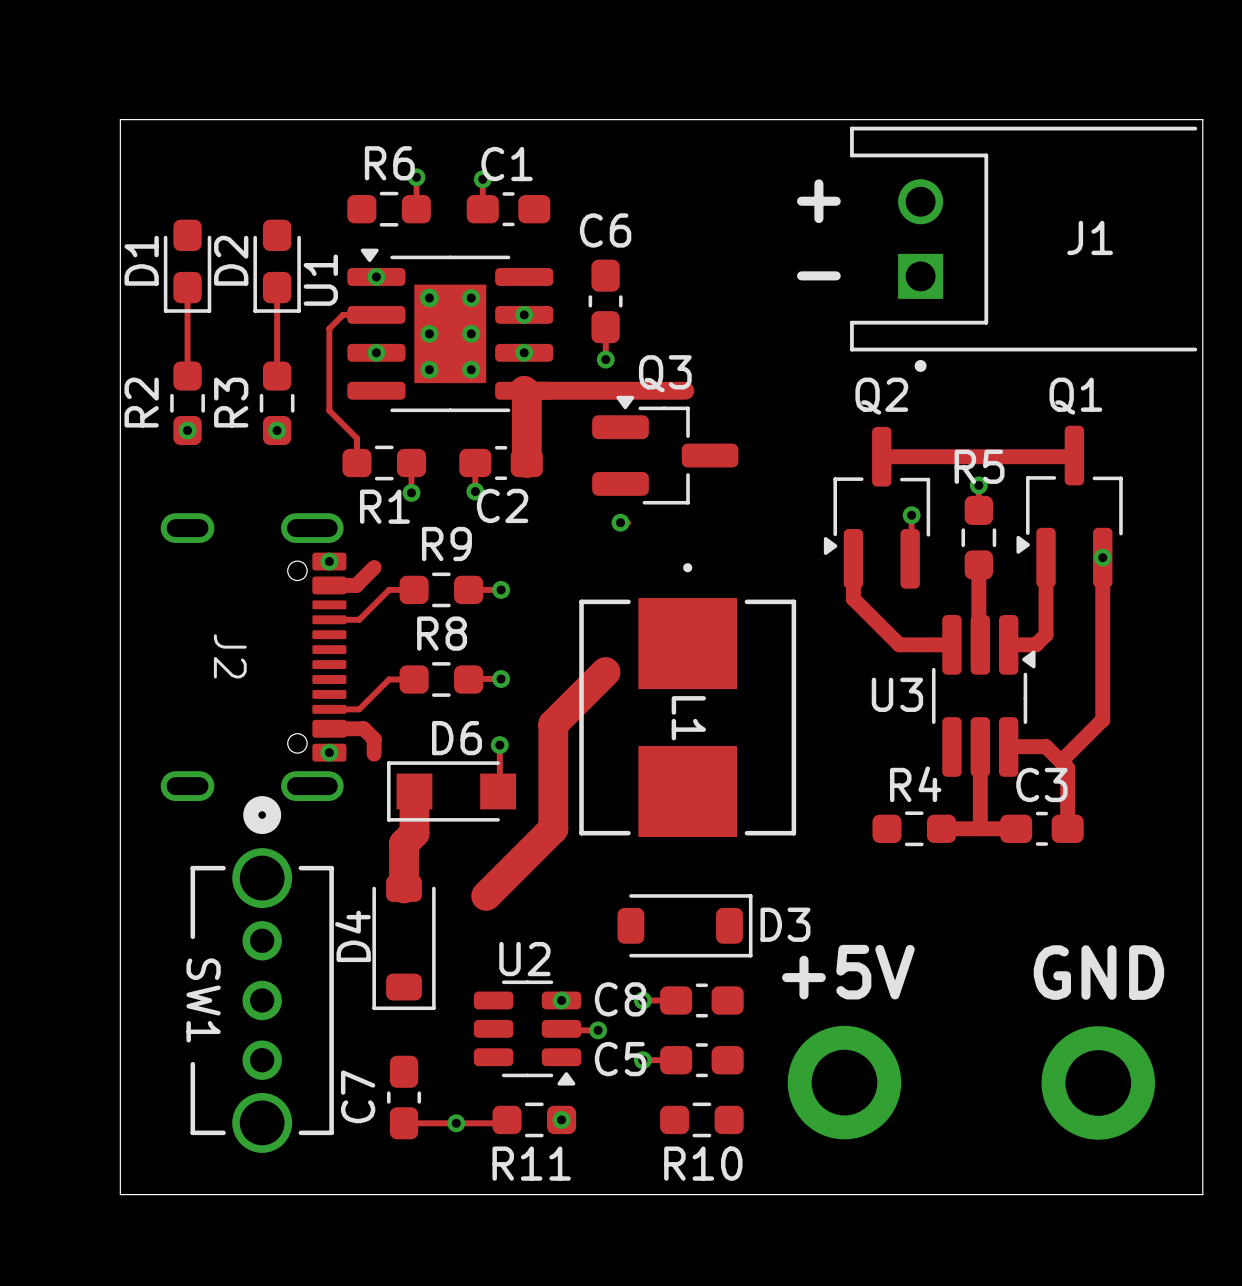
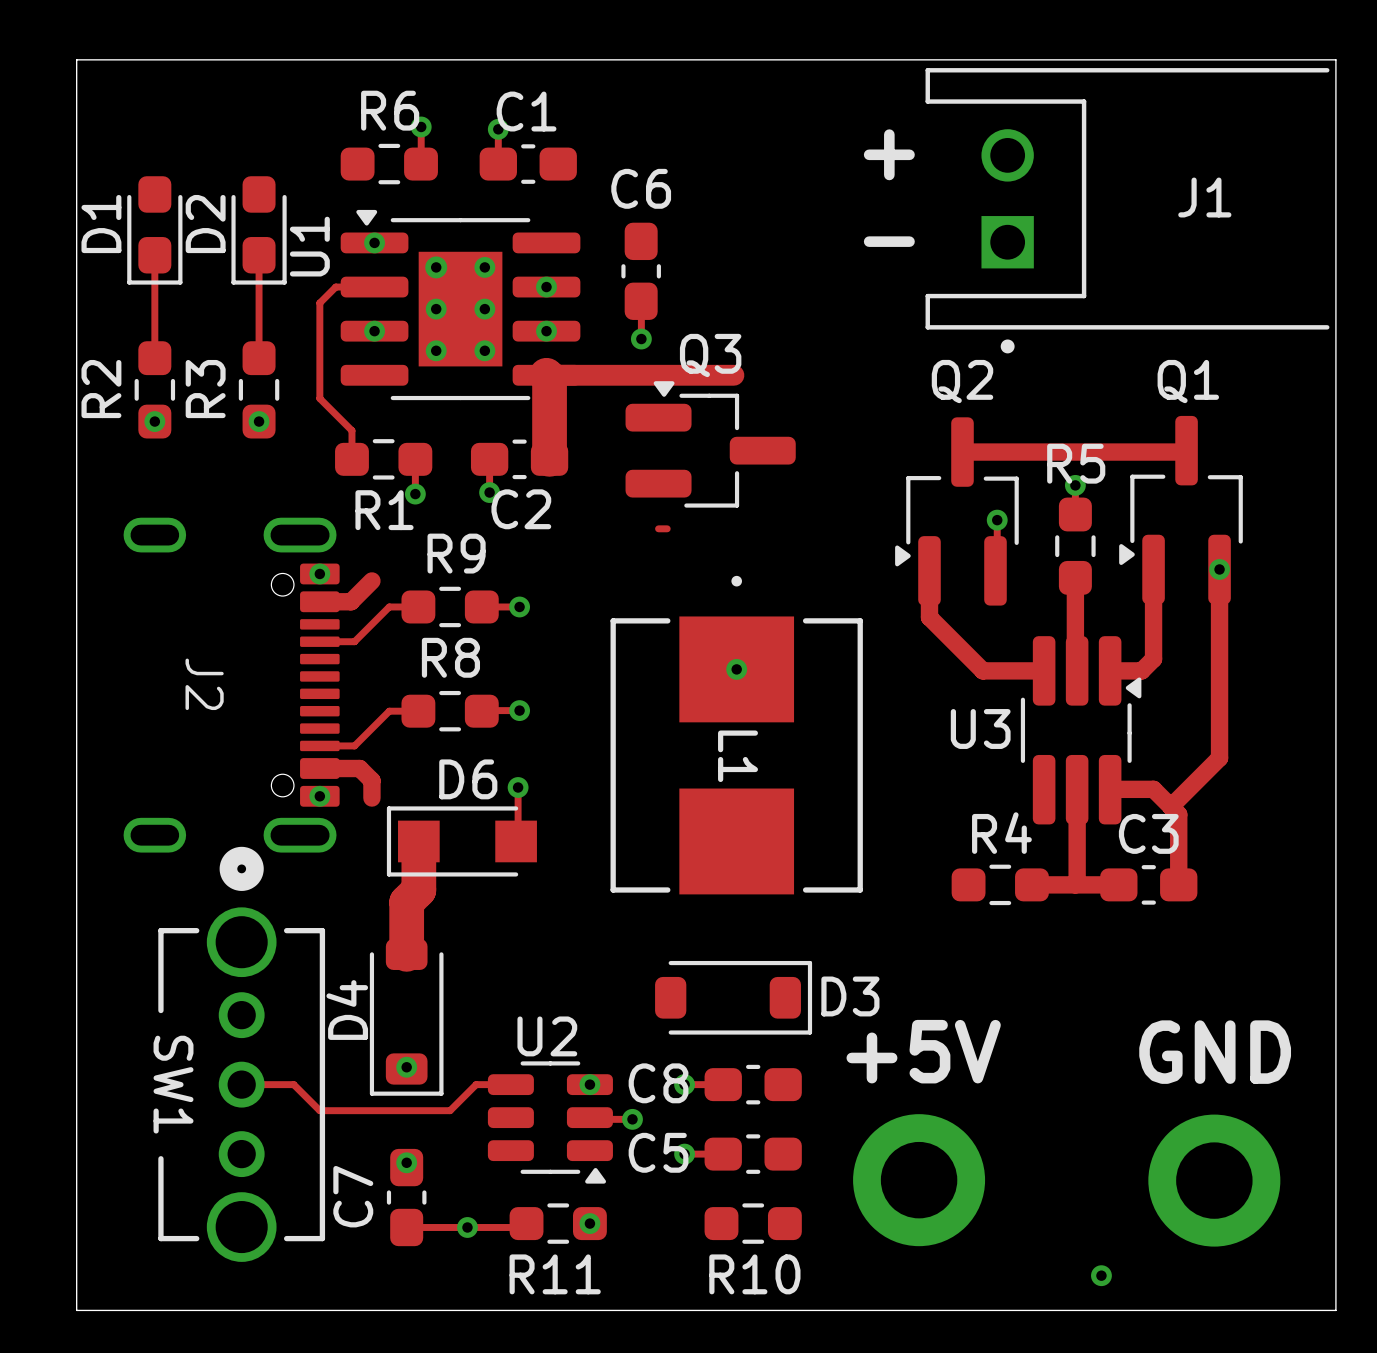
via position: (620, 522) -> (736, 669)
track: (605, 672) (553, 724) (553, 828) (486, 895) -> none
via: none -> (406, 1067)
track: none -> (241, 1084) (293, 1084) (319, 1110) (450, 1110) (476, 1084) (510, 1084)
via: none -> (406, 1162)
via: none -> (1101, 1275)

